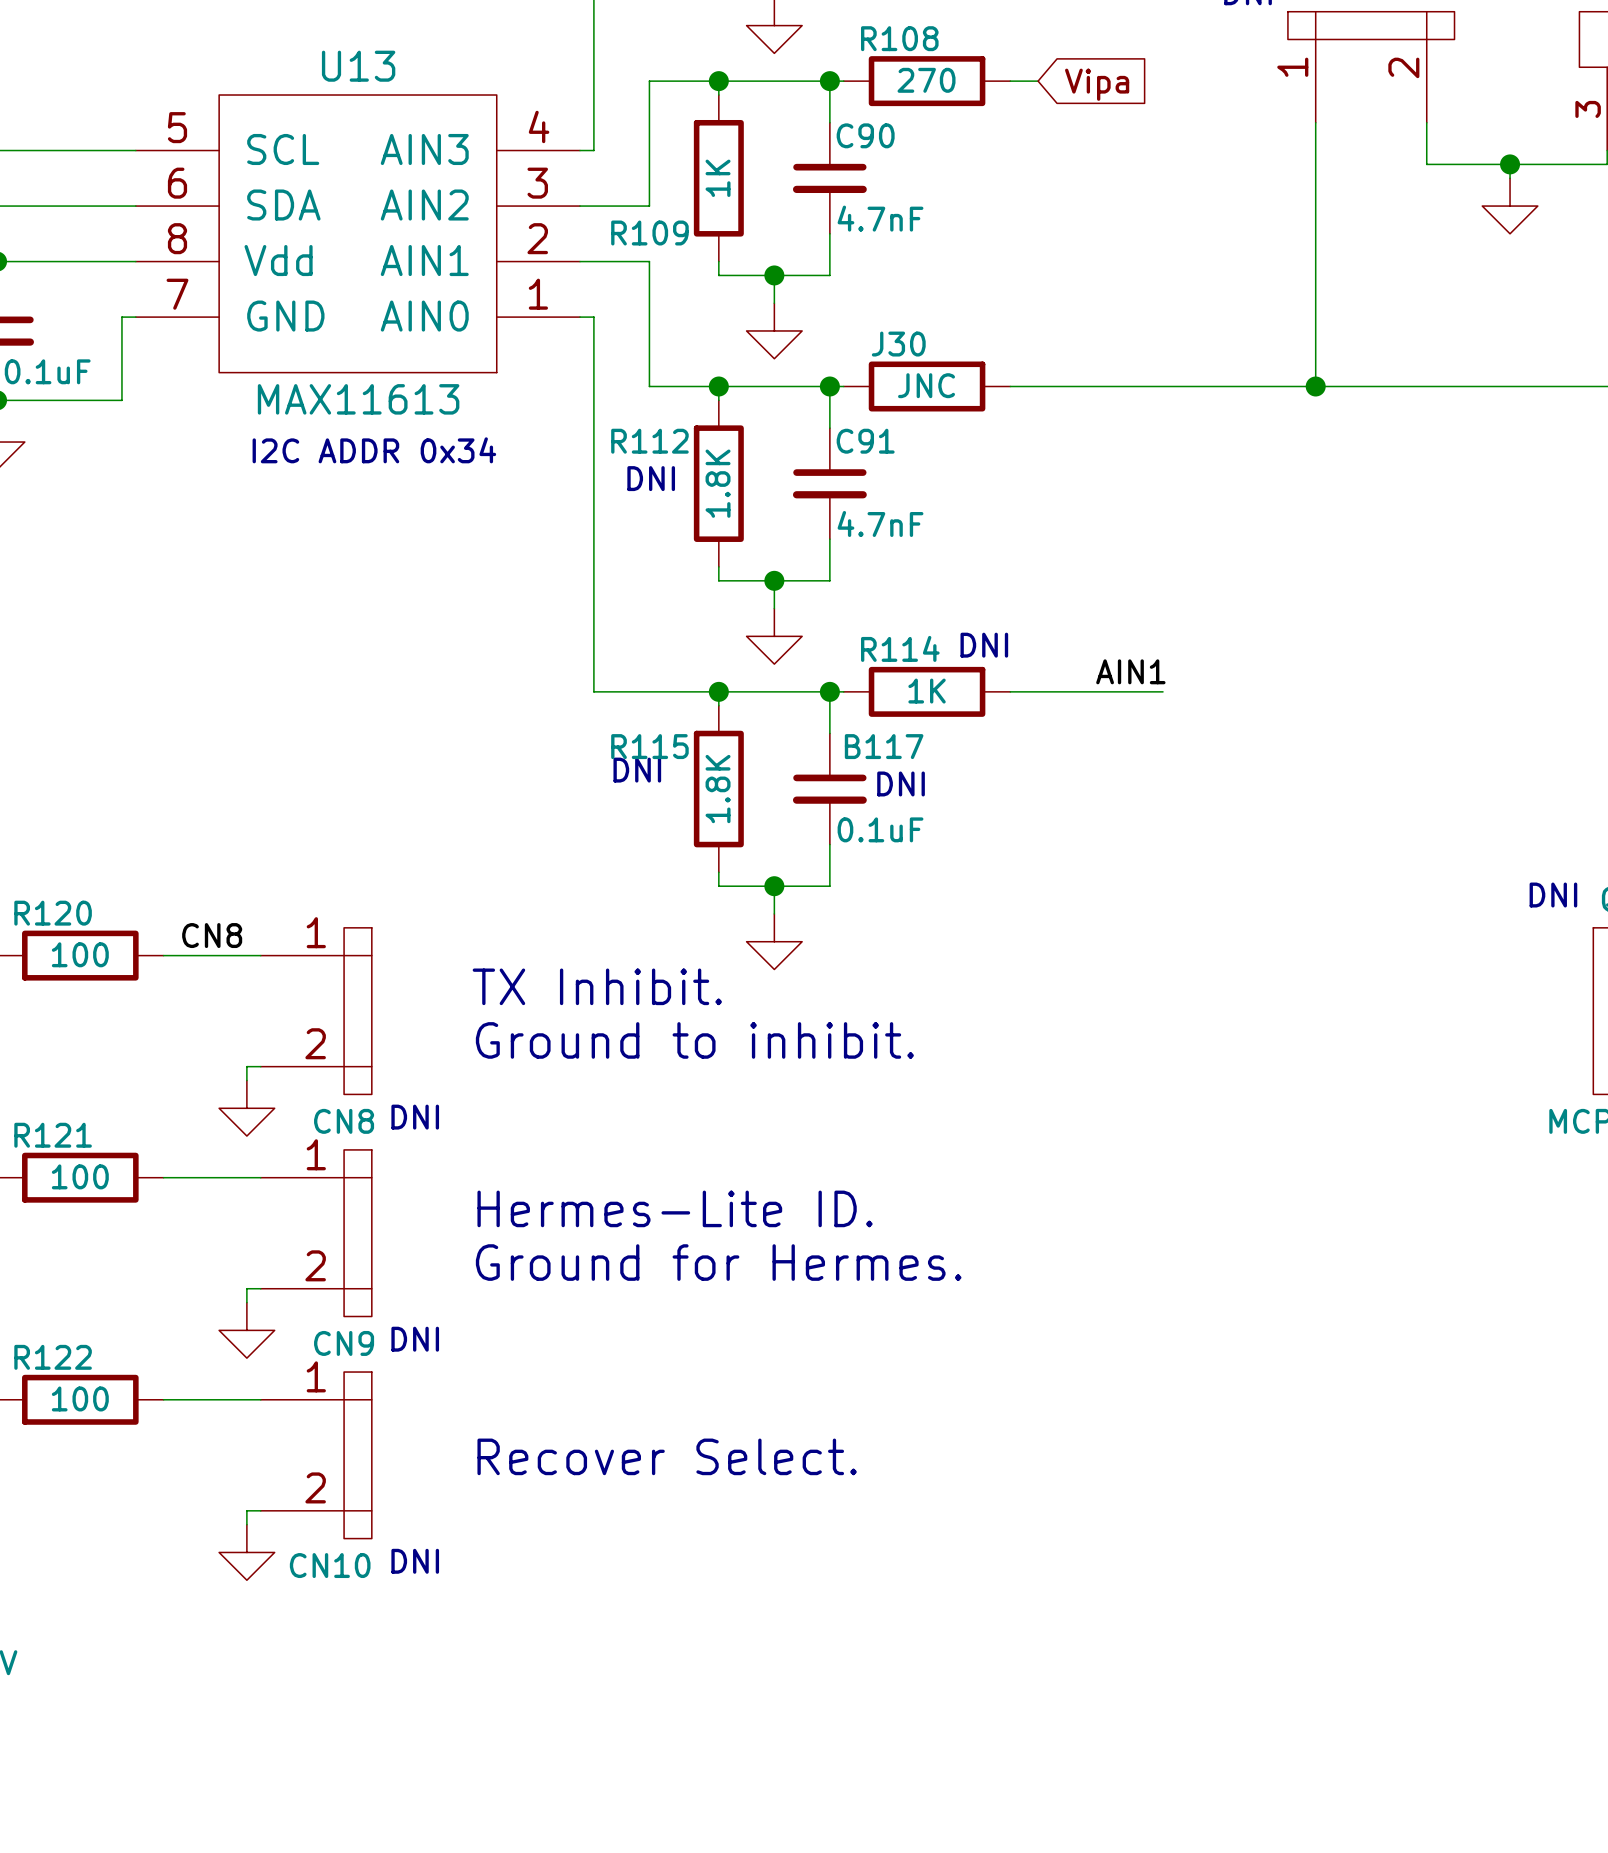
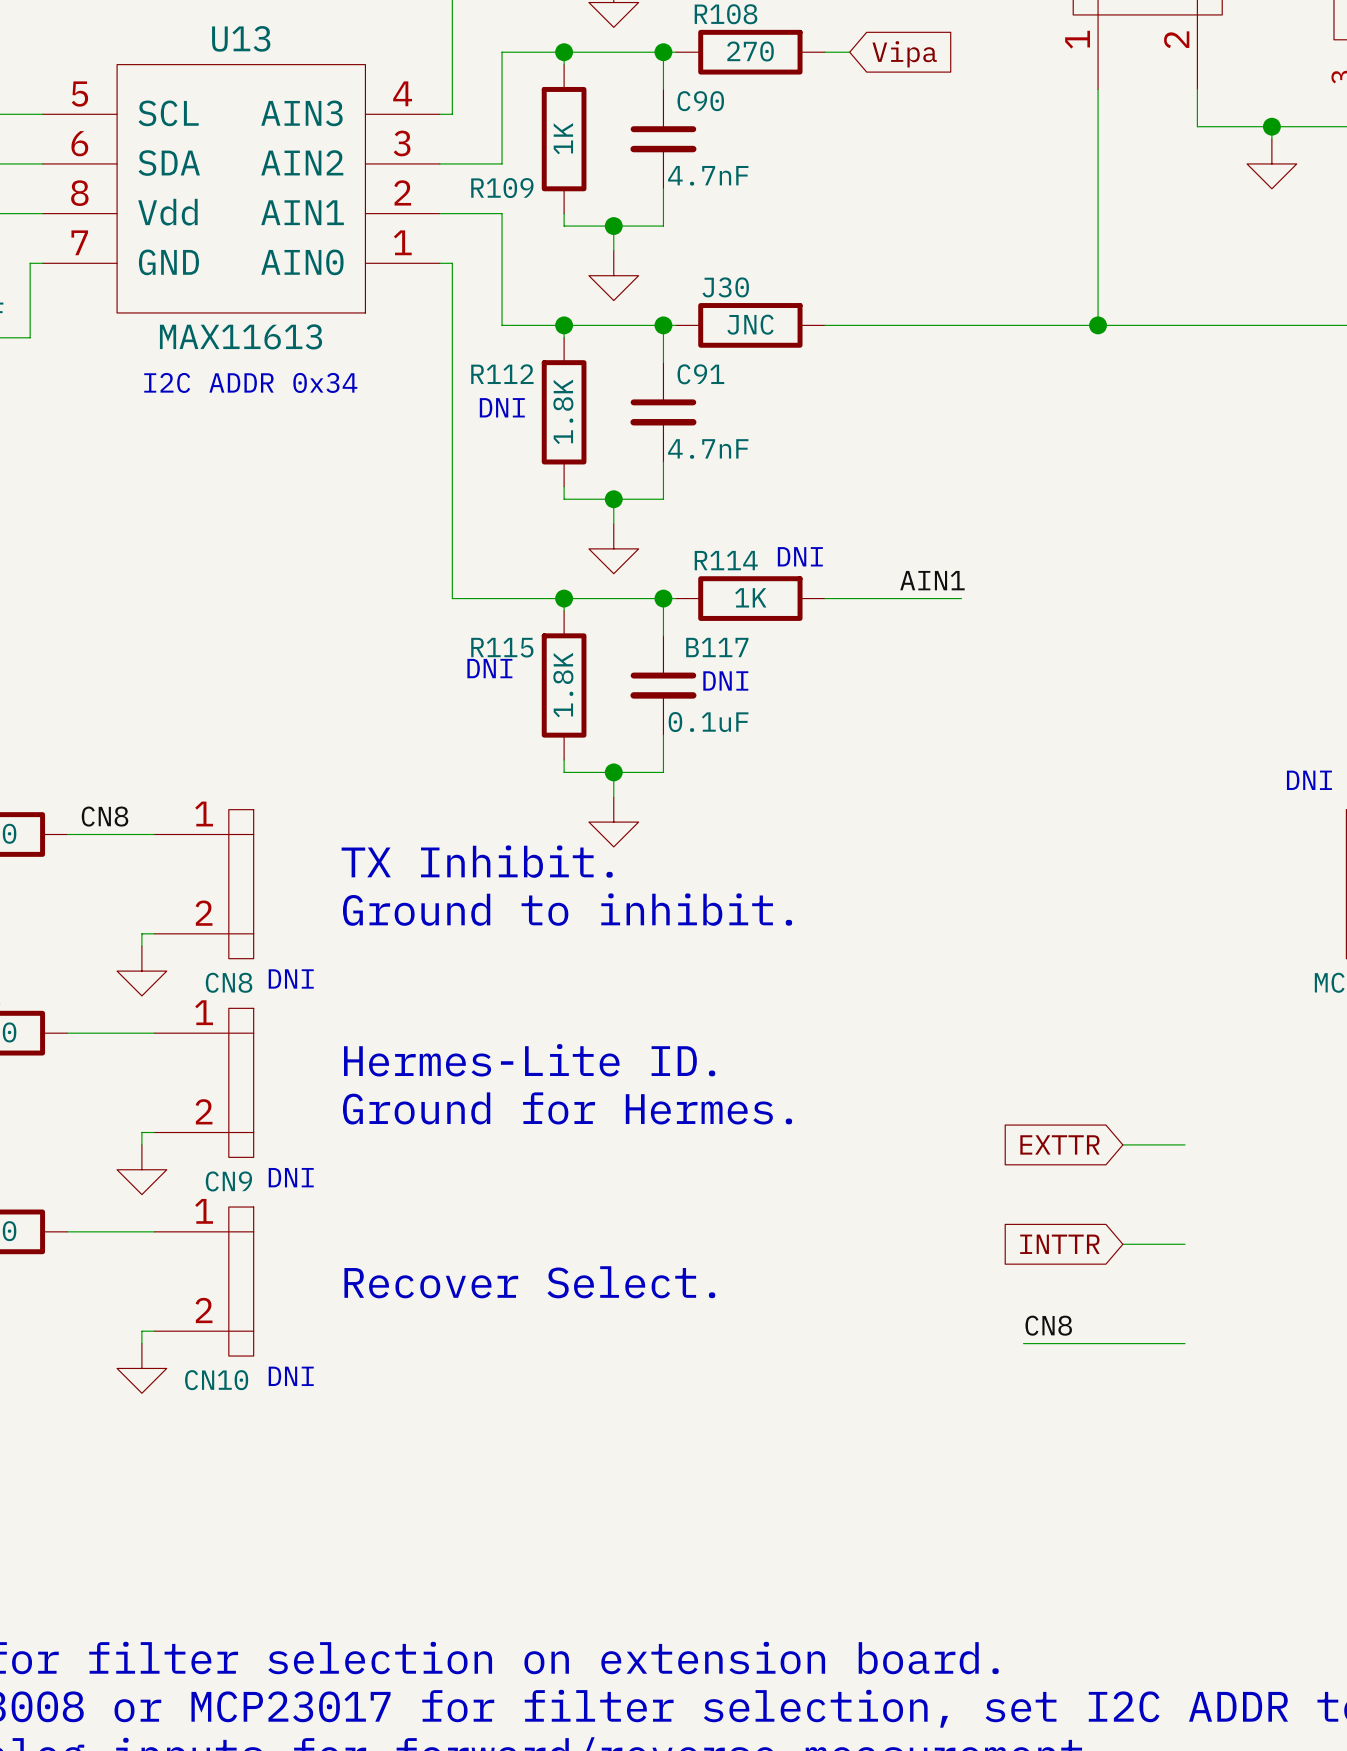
global label: none -> EXTTR (1060, 1144)
wire: none -> (1122, 1144) (1184, 1144)
global label: none -> INTTR (1059, 1244)
wire: none -> (1122, 1244) (1184, 1244)
label: none -> CN8 (1048, 1325)
wire: none -> (1023, 1343) (1184, 1343)

